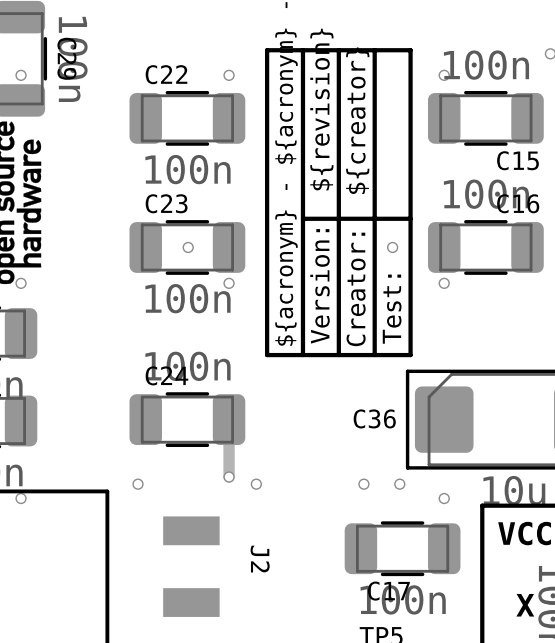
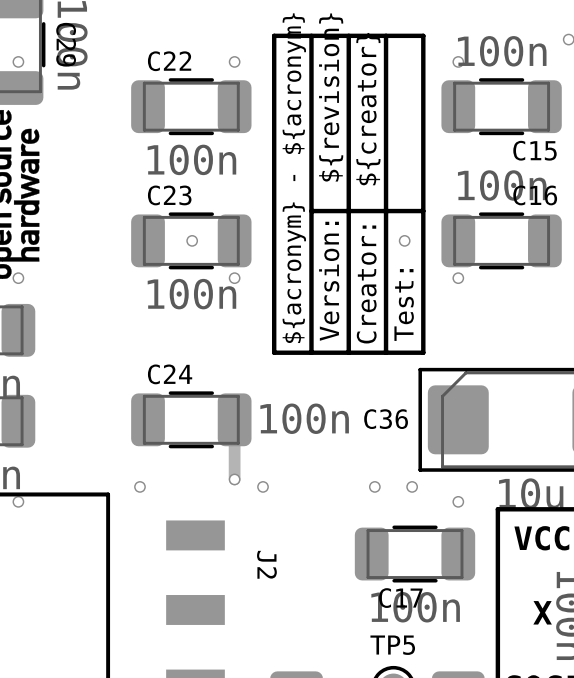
C24 value position: 100n (188, 366) -> 100n (304, 418)

